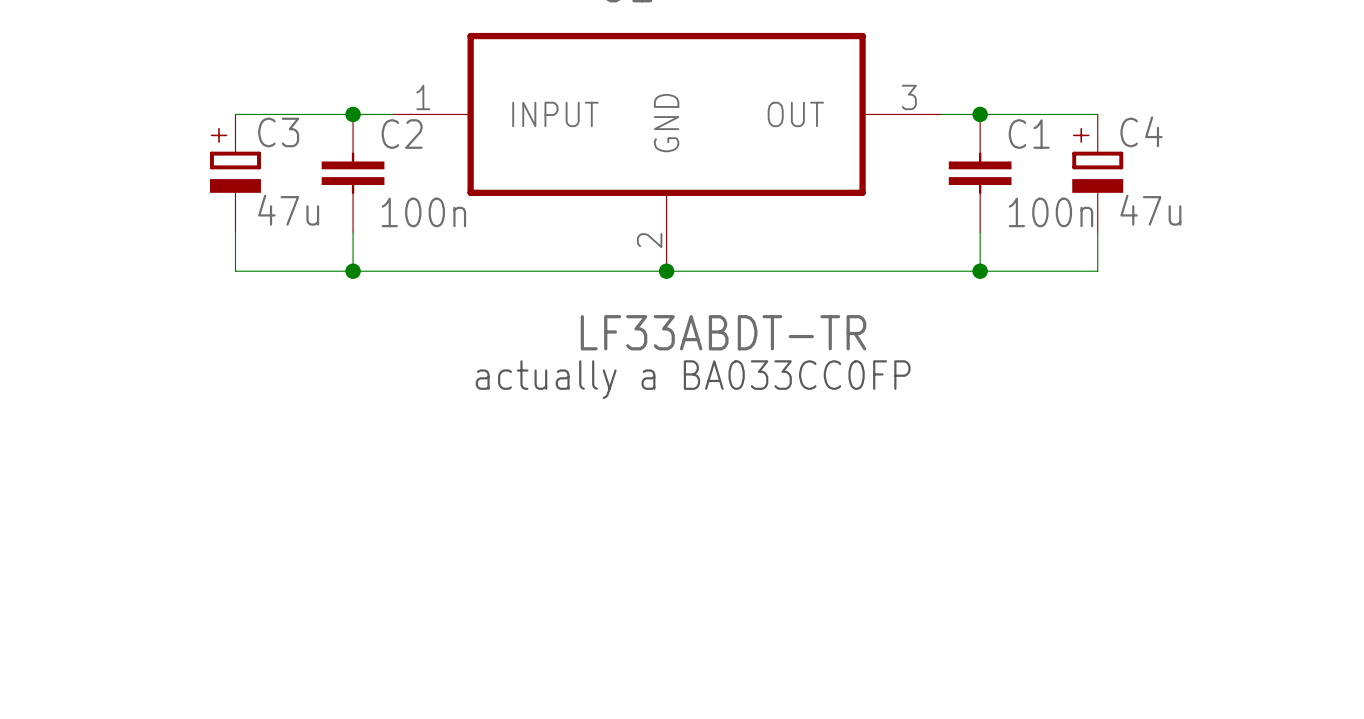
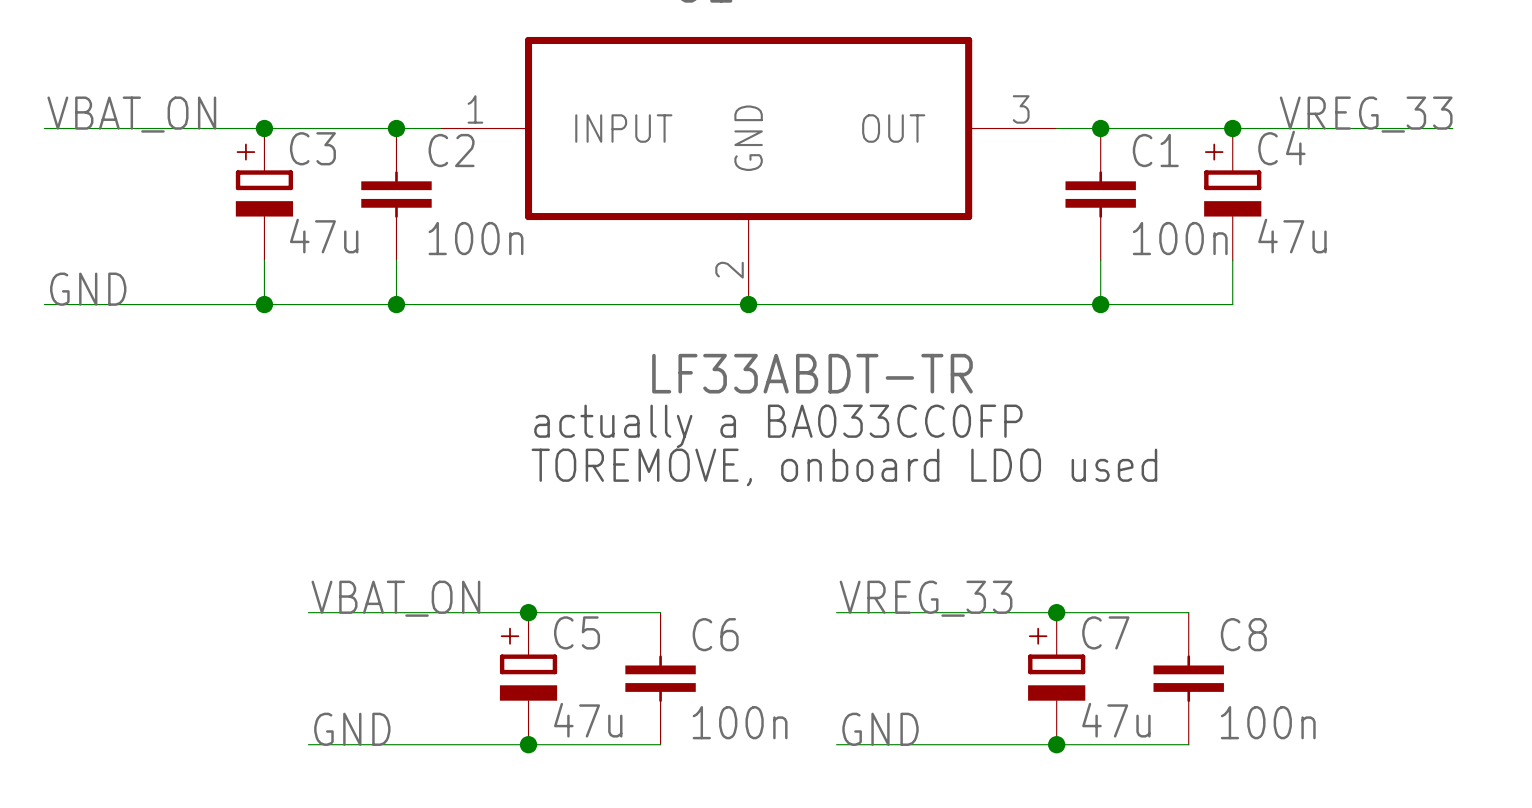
label: none -> VBAT_ON (131, 114)
label: none -> VREG_33 (1366, 114)
wire: none -> (44, 128) (264, 128)
junction: none -> (264, 128)
wire: none -> (1232, 128) (1452, 128)
junction: none -> (1232, 128)
label: none -> GND (88, 289)
wire: none -> (44, 304) (264, 304)
junction: none -> (264, 304)
text: none -> TOREMOVE, onboard LDO used (844, 467)
label: none -> VBAT_ON (395, 598)
label: none -> VREG_33 (926, 598)
wire: none -> (308, 612) (660, 612)
junction: none -> (528, 612)
wire: none -> (836, 612) (1188, 612)
junction: none -> (1056, 612)
C5: none -> 47u (528, 678)
C6: none -> 100n (660, 678)
C7: none -> 47u (1056, 678)
C8: none -> 100n (1188, 678)
label: none -> GND (352, 729)
label: none -> GND (880, 729)
wire: none -> (308, 744) (660, 744)
junction: none -> (528, 744)
wire: none -> (836, 744) (1188, 744)
junction: none -> (1056, 744)

